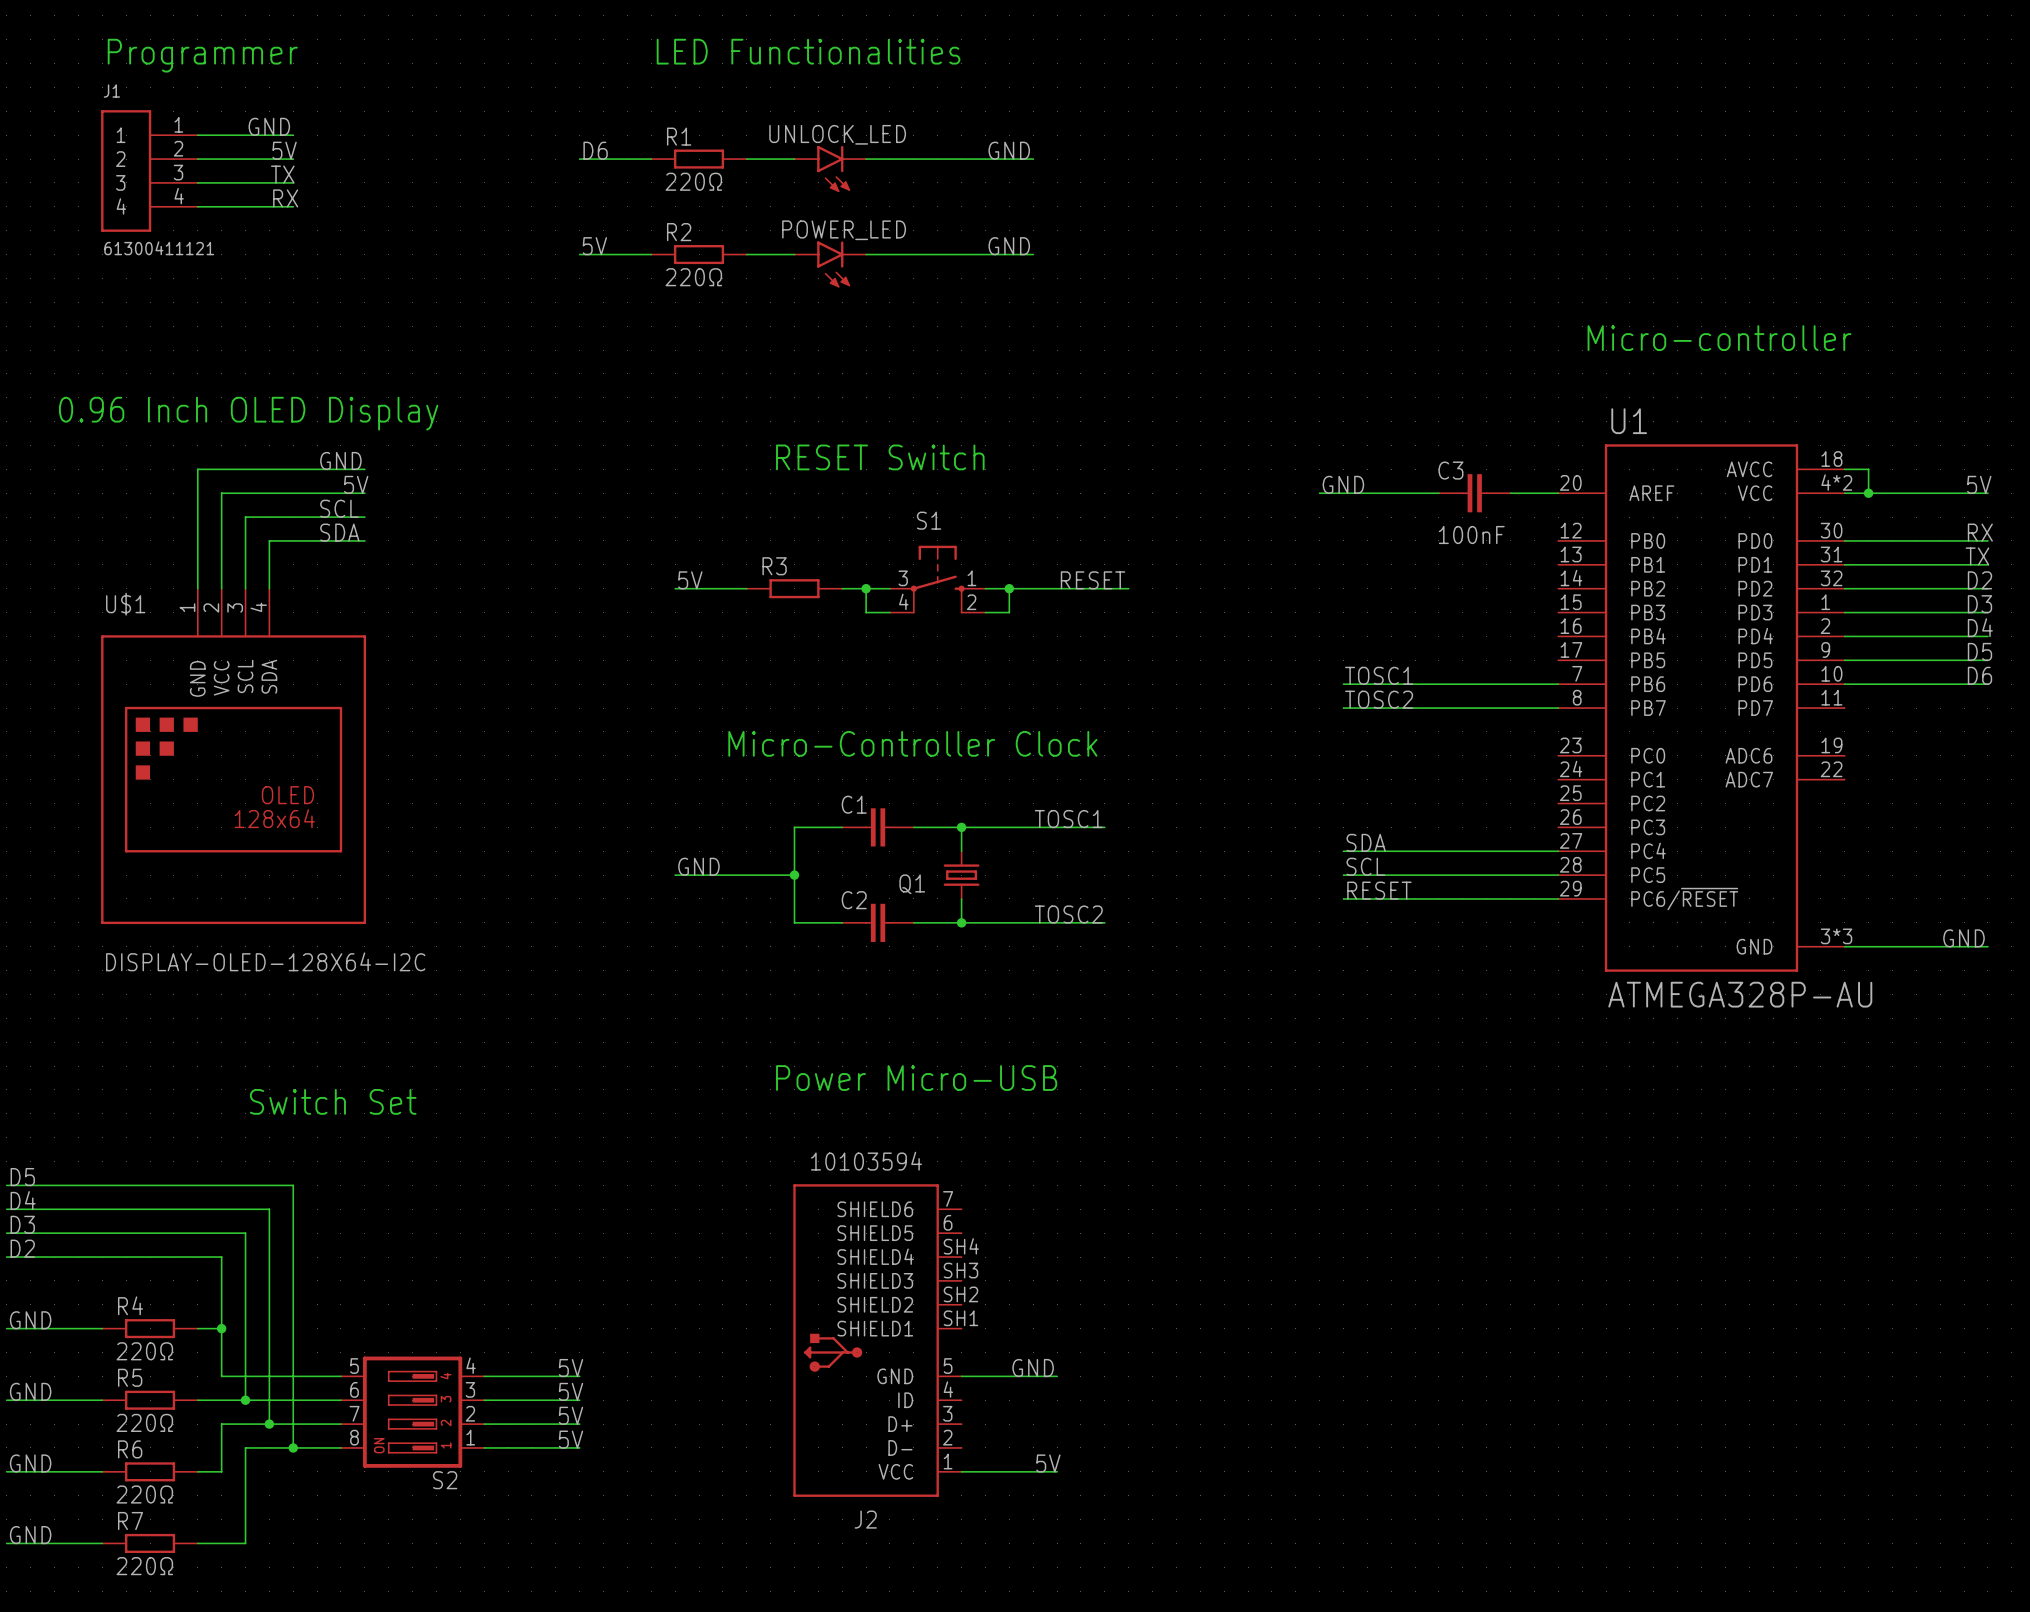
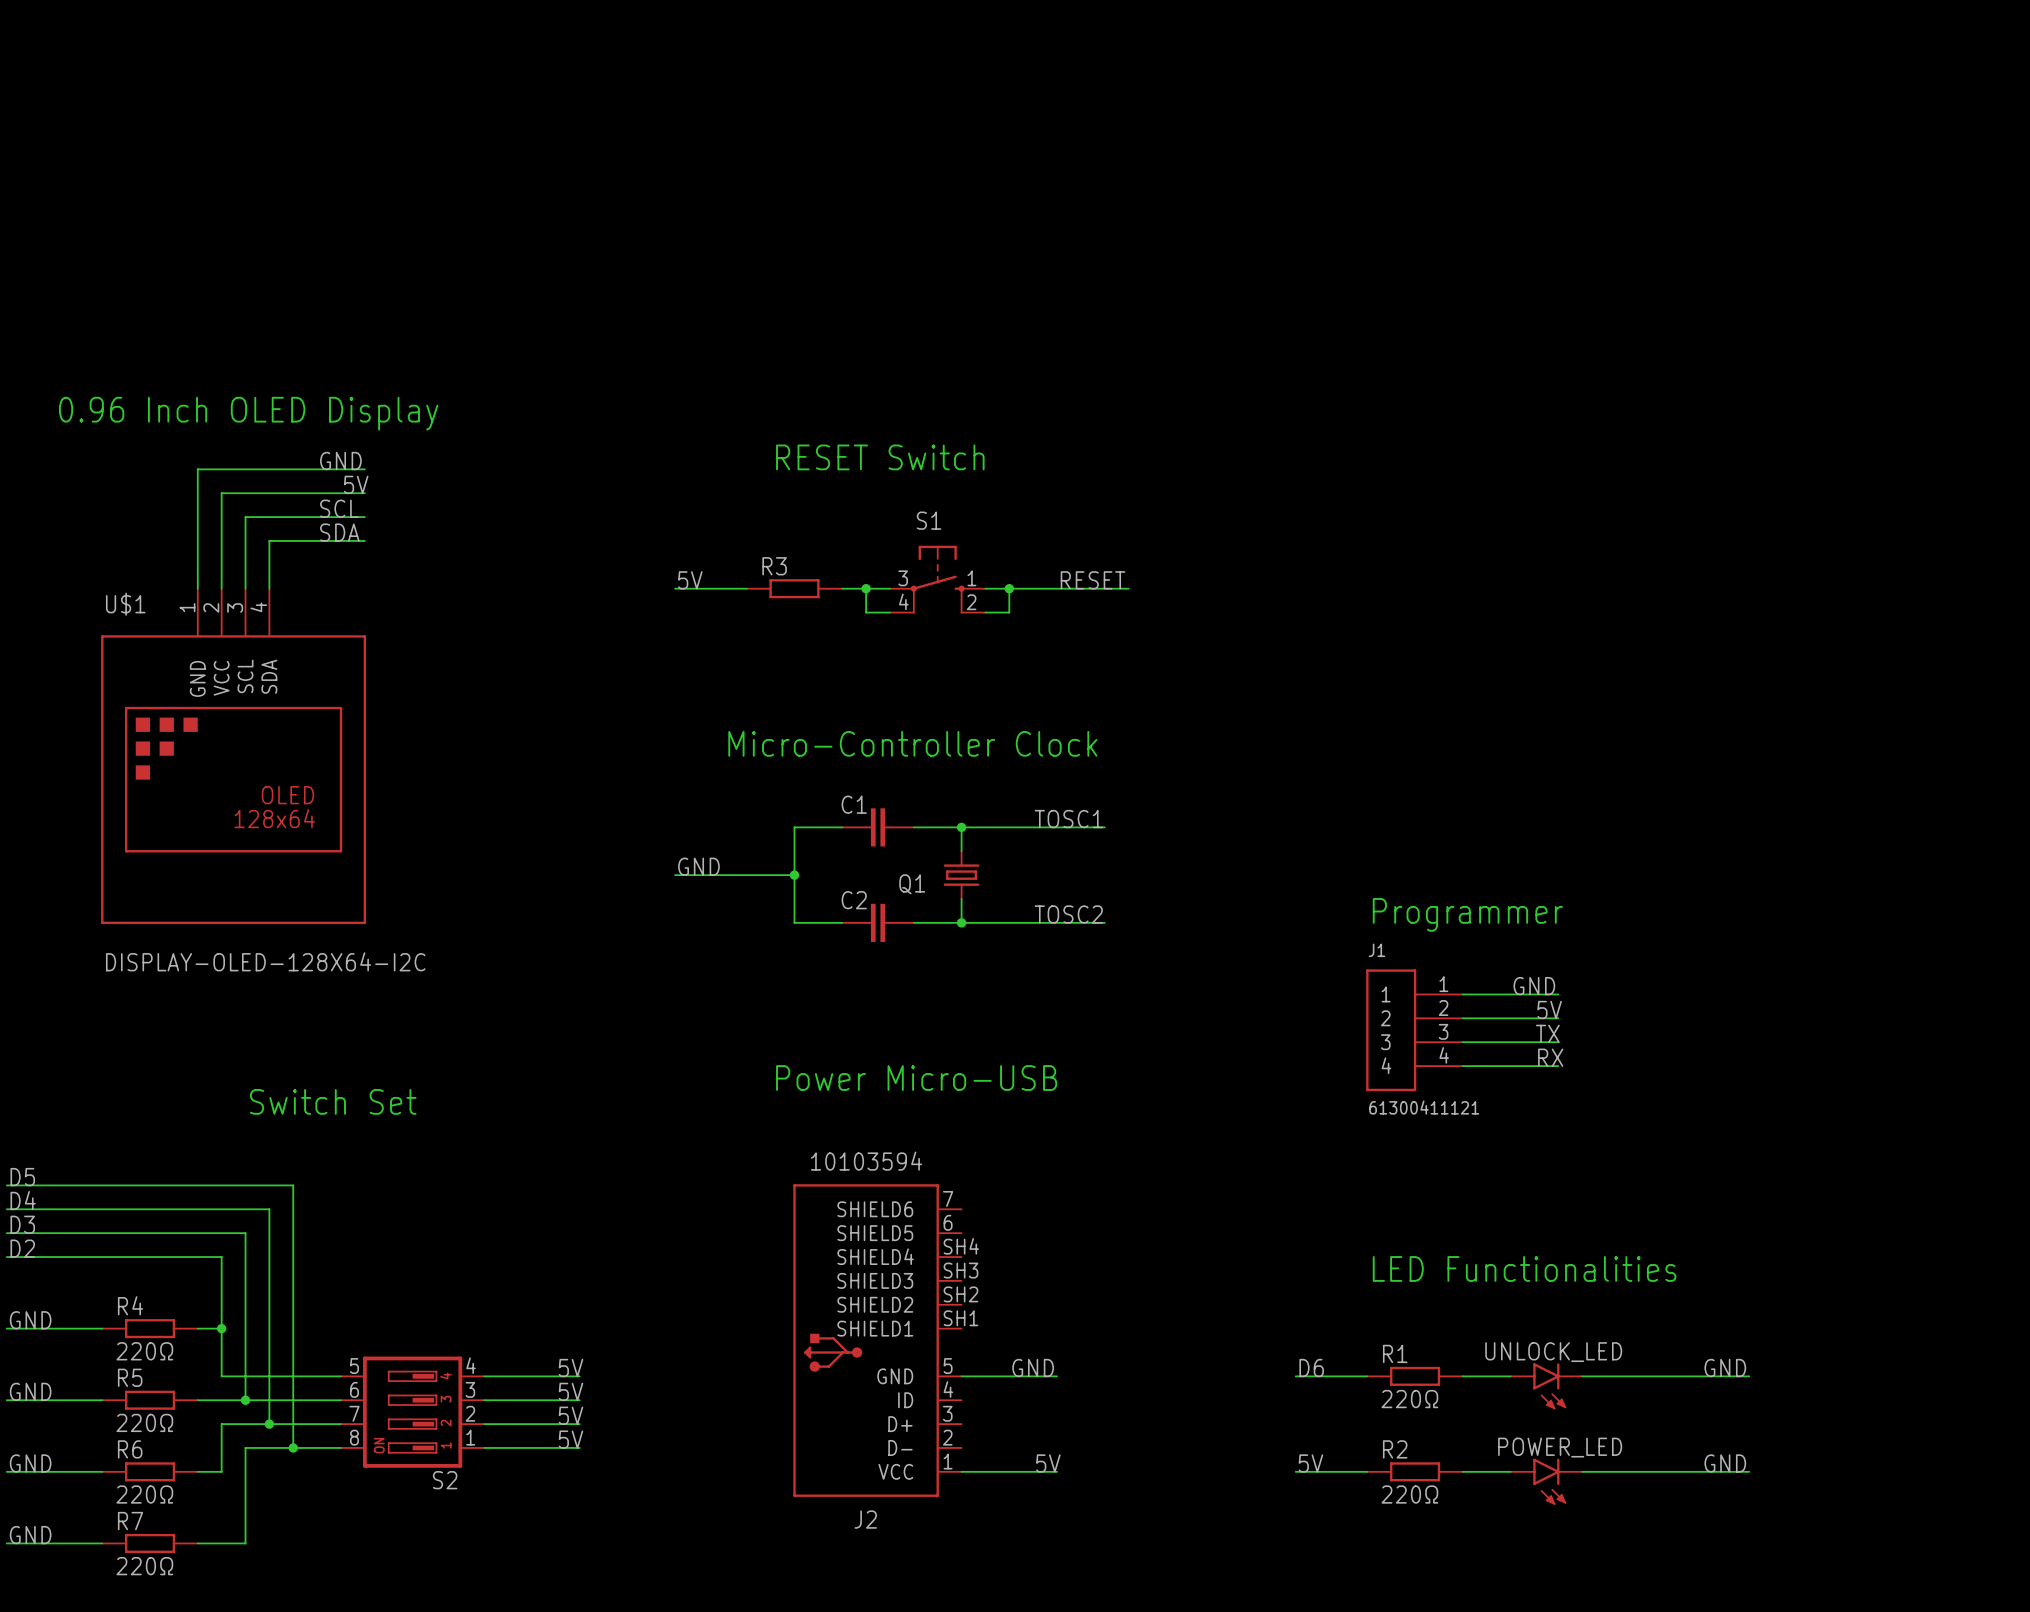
text: LED Functionalities (808, 51) -> none
text: Programmer (202, 55) -> none
label: GND (269, 126) -> none
wire: (197, 135) (293, 135) -> none
label: 5V (284, 150) -> none
label: D6 (595, 150) -> none
label: GND (1009, 150) -> none
wire: (197, 159) (293, 159) -> none
wire: (579, 159) (651, 159) -> none
R1 position: (699, 159) -> (1415, 1376)
wire: (746, 159) (794, 159) -> none
wire: (866, 159) (1033, 159) -> none
UNLOCK_LED: (830, 168) -> none
J1 position: (149, 171) -> (1414, 1030)
label: TX (282, 174) -> none
wire: (197, 182) (293, 182) -> none
label: RX (285, 198) -> none
wire: (197, 206) (293, 206) -> none
label: 5V (594, 246) -> none
label: GND (1009, 246) -> none
wire: (579, 254) (651, 254) -> none
R2 position: (699, 254) -> (1415, 1471)
wire: (746, 254) (794, 254) -> none
wire: (866, 254) (1033, 254) -> none
POWER_LED: (830, 264) -> none
text: Micro-controller (1719, 338) -> none
wire: (1844, 469) (1868, 469) (1868, 493) -> none
label: GND (1343, 484) -> none
label: 5V (1979, 484) -> none
wire: (1319, 493) (1438, 493) -> none
C3: 100nF (1474, 493) -> none
wire: (1510, 493) (1558, 493) -> none
wire: (1844, 493) (1987, 493) -> none
junction: (1868, 493) -> none
label: RX (1980, 532) -> none
wire: (1844, 540) (1987, 540) -> none
label: TX (1977, 556) -> none
wire: (1844, 564) (1987, 564) -> none
label: D2 (1979, 580) -> none
wire: (1844, 588) (1987, 588) -> none
label: D3 (1979, 604) -> none
wire: (1844, 612) (1987, 612) -> none
label: D4 (1980, 627) -> none
wire: (1844, 636) (1987, 636) -> none
label: D5 (1979, 651) -> none
wire: (1844, 660) (1987, 660) -> none
label: TOSC1 (1379, 675) -> none
label: D6 (1979, 675) -> none
wire: (1343, 684) (1558, 684) -> none
wire: (1844, 684) (1987, 684) -> none
label: TOSC2 (1379, 699) -> none
wire: (1343, 708) (1558, 708) -> none
U1: ATMEGA328P-AU (1701, 708) -> none
label: SDA (1366, 842) -> none
wire: (1343, 851) (1558, 851) -> none
label: SCL (1365, 866) -> none
wire: (1343, 875) (1558, 875) -> none
label: RESET (1379, 890) -> none
wire: (1343, 898) (1558, 898) -> none
text: none -> Programmer (1467, 914)
label: GND (1963, 938) -> none
wire: (1844, 946) (1987, 946) -> none
label: none -> GND (1534, 986)
wire: none -> (1462, 994) (1558, 994)
label: none -> 5V (1549, 1009)
wire: none -> (1462, 1018) (1558, 1018)
label: none -> TX (1547, 1033)
wire: none -> (1462, 1042) (1558, 1042)
label: none -> RX (1550, 1057)
wire: none -> (1462, 1066) (1558, 1066)
text: none -> LED Functionalities (1524, 1268)
label: none -> D6 (1311, 1368)
label: none -> GND (1725, 1368)
wire: none -> (1295, 1376) (1367, 1376)
wire: none -> (1462, 1376) (1510, 1376)
wire: none -> (1582, 1376) (1749, 1376)
UNLOCK_LED: none -> (1546, 1386)
label: none -> 5V (1310, 1463)
label: none -> GND (1725, 1463)
wire: none -> (1295, 1471) (1367, 1471)
wire: none -> (1462, 1471) (1510, 1471)
wire: none -> (1582, 1471) (1749, 1471)
POWER_LED: none -> (1546, 1481)

